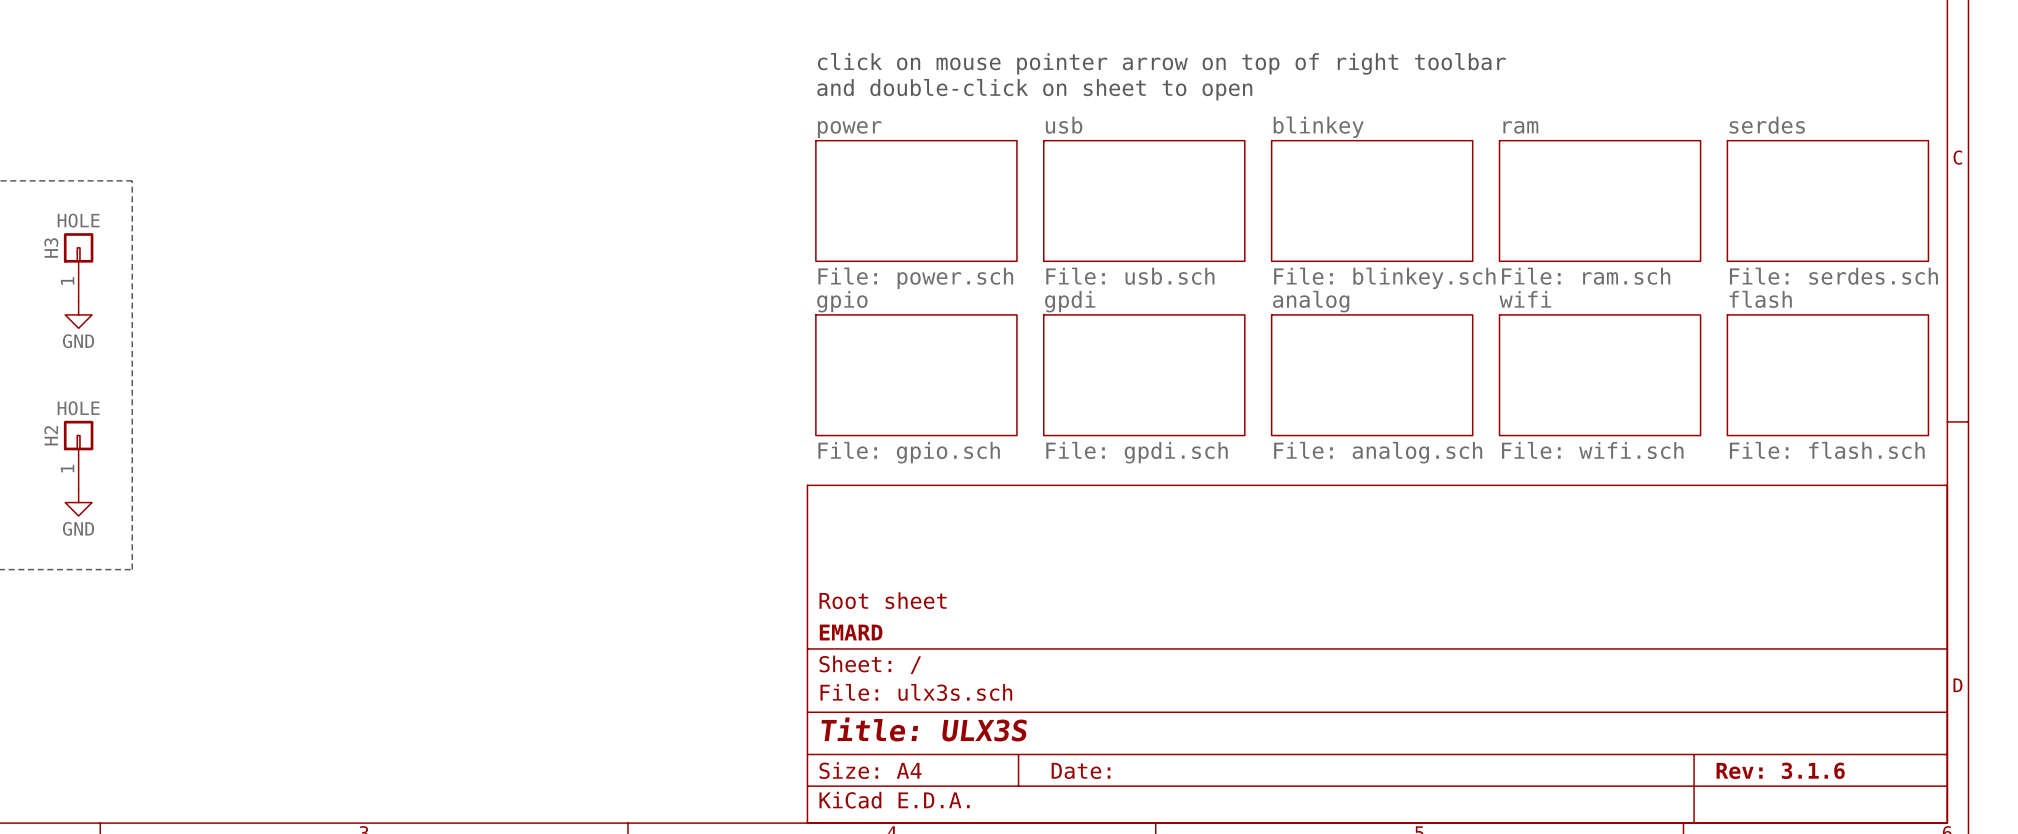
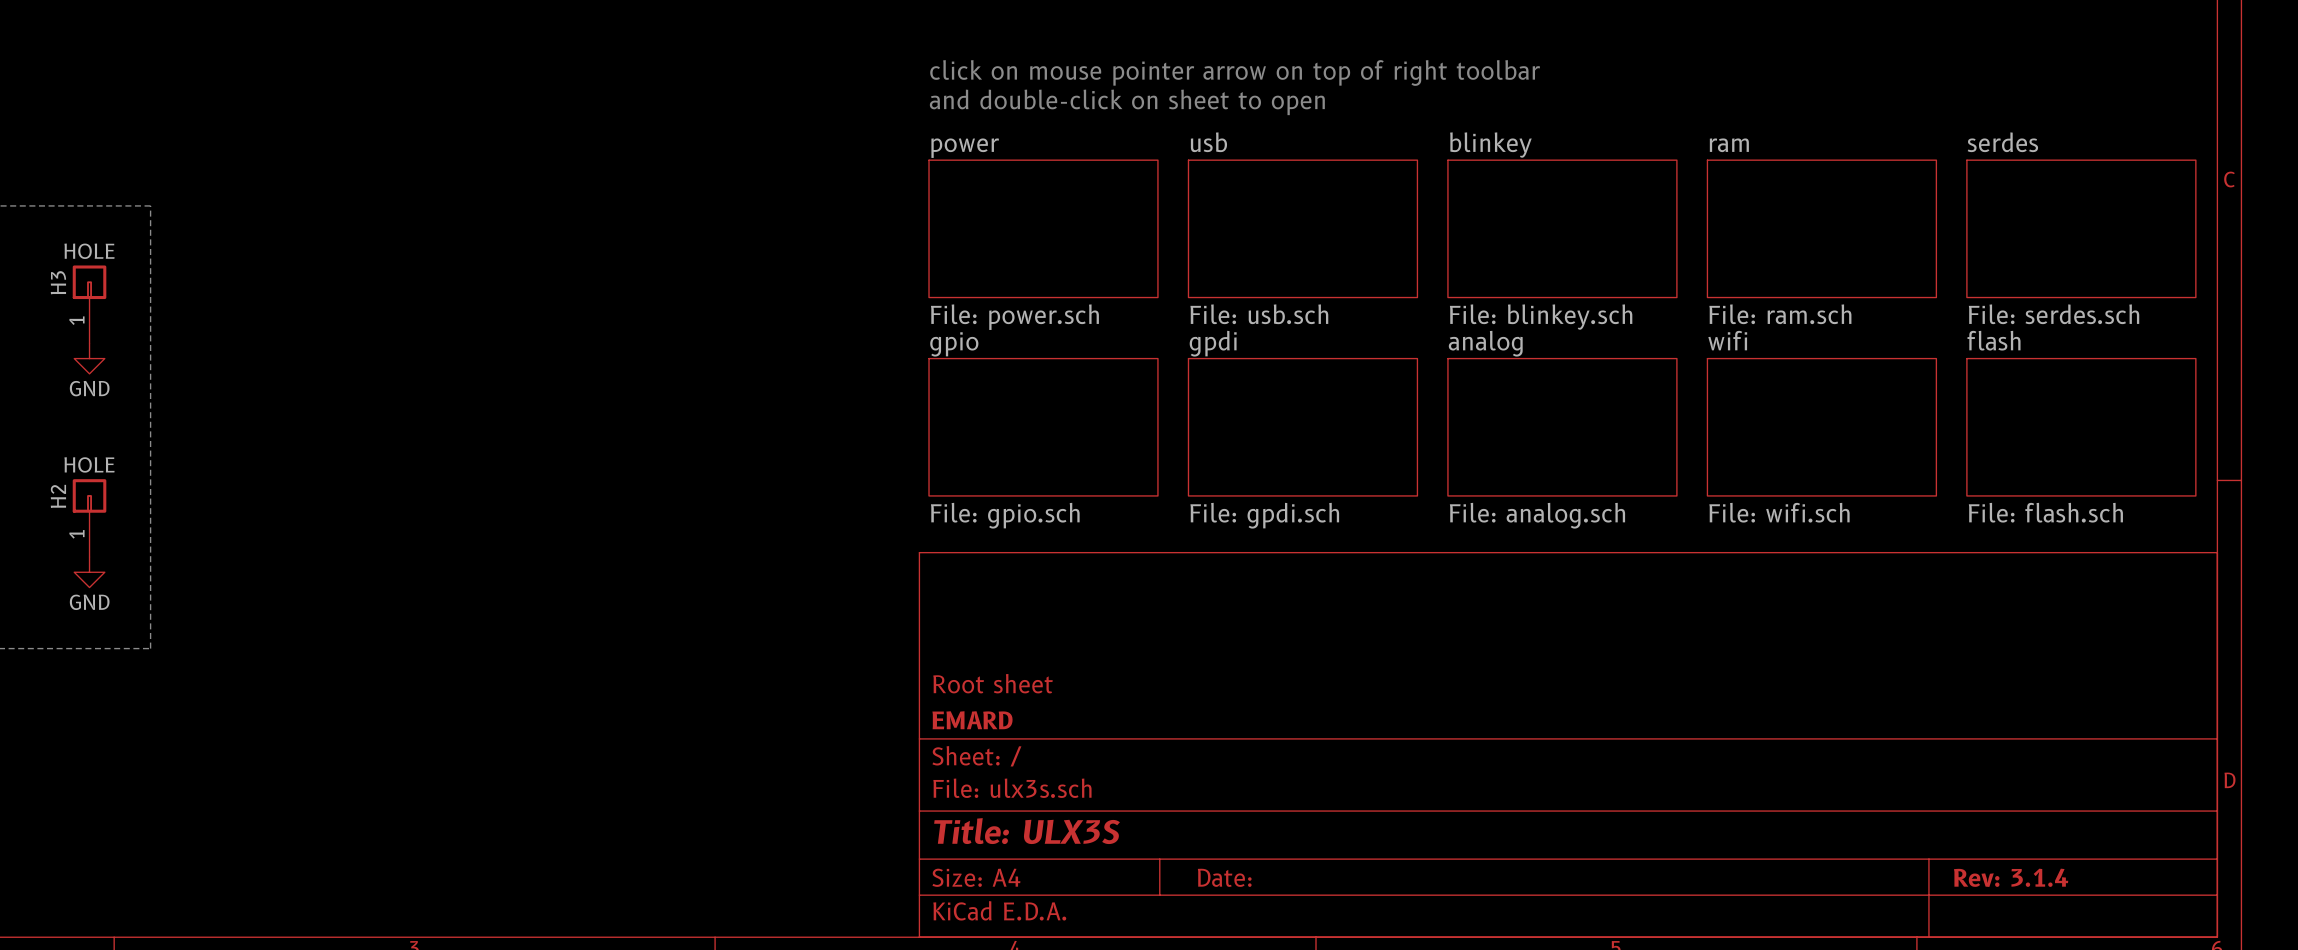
title block: Rev: 3.1.6 (1780, 770) -> Rev: 3.1.4 (2011, 877)

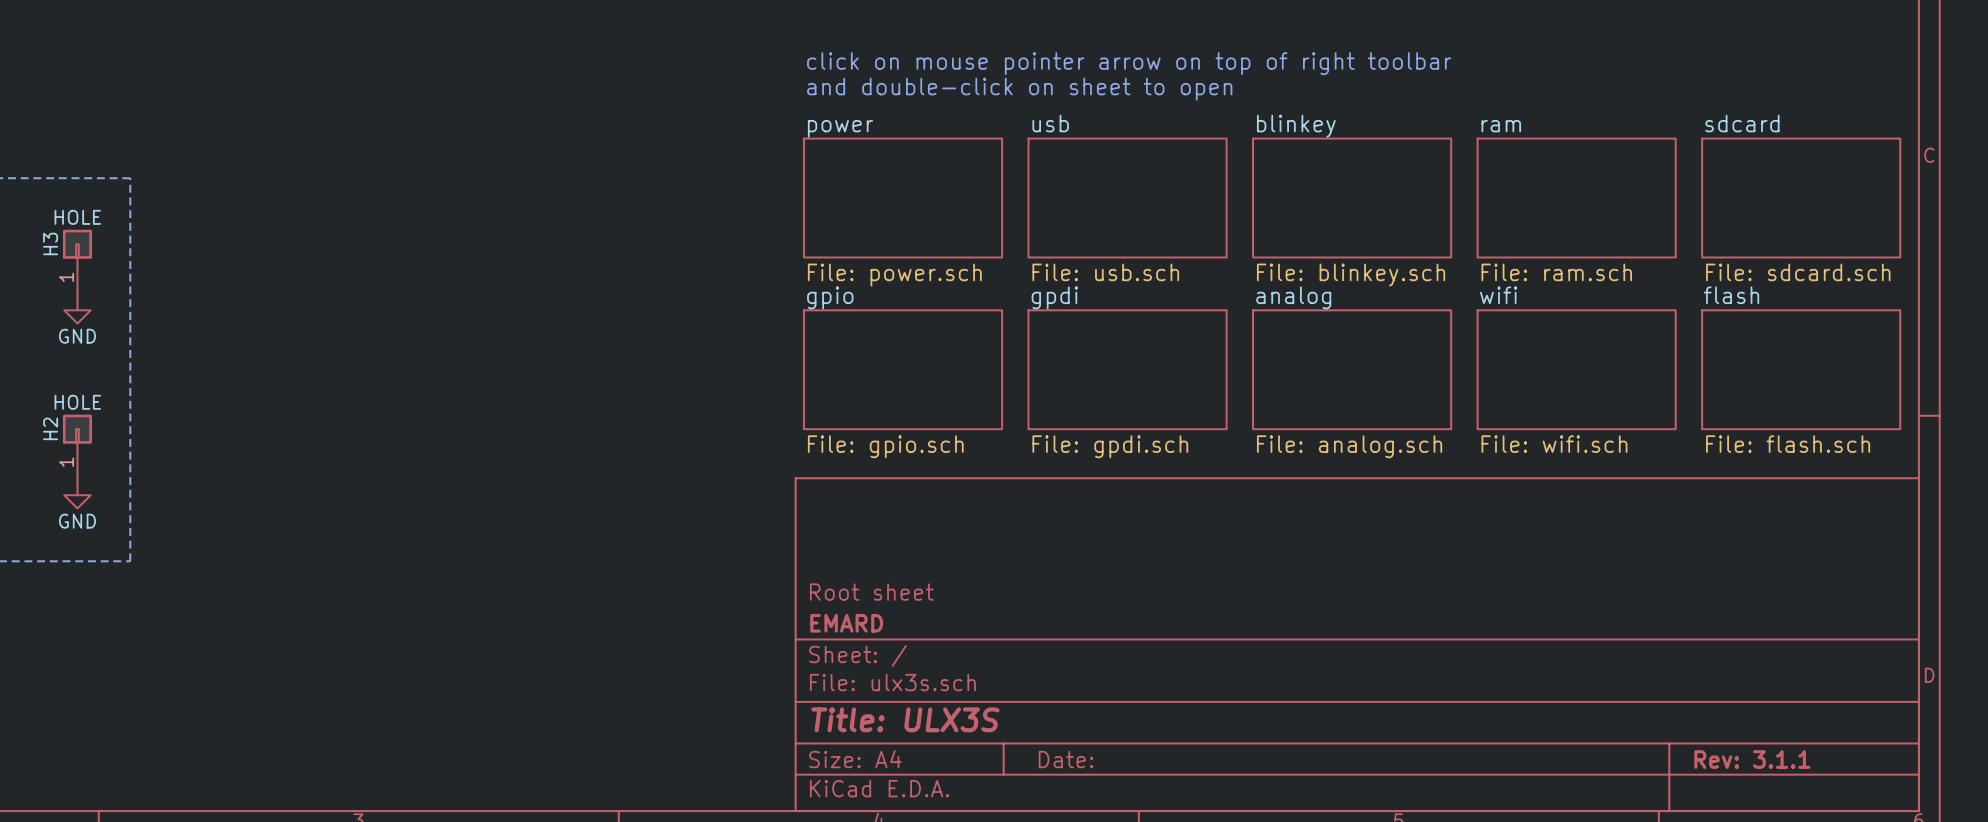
sheet serdes name: serdes (2002, 142) -> sdcard (1742, 123)
sheet serdes value: File: serdes.sch (2054, 314) -> File: sdcard.sch (1798, 272)
title block: Rev: 3.1.4 (2011, 877) -> Rev: 3.1.1 (1752, 759)

